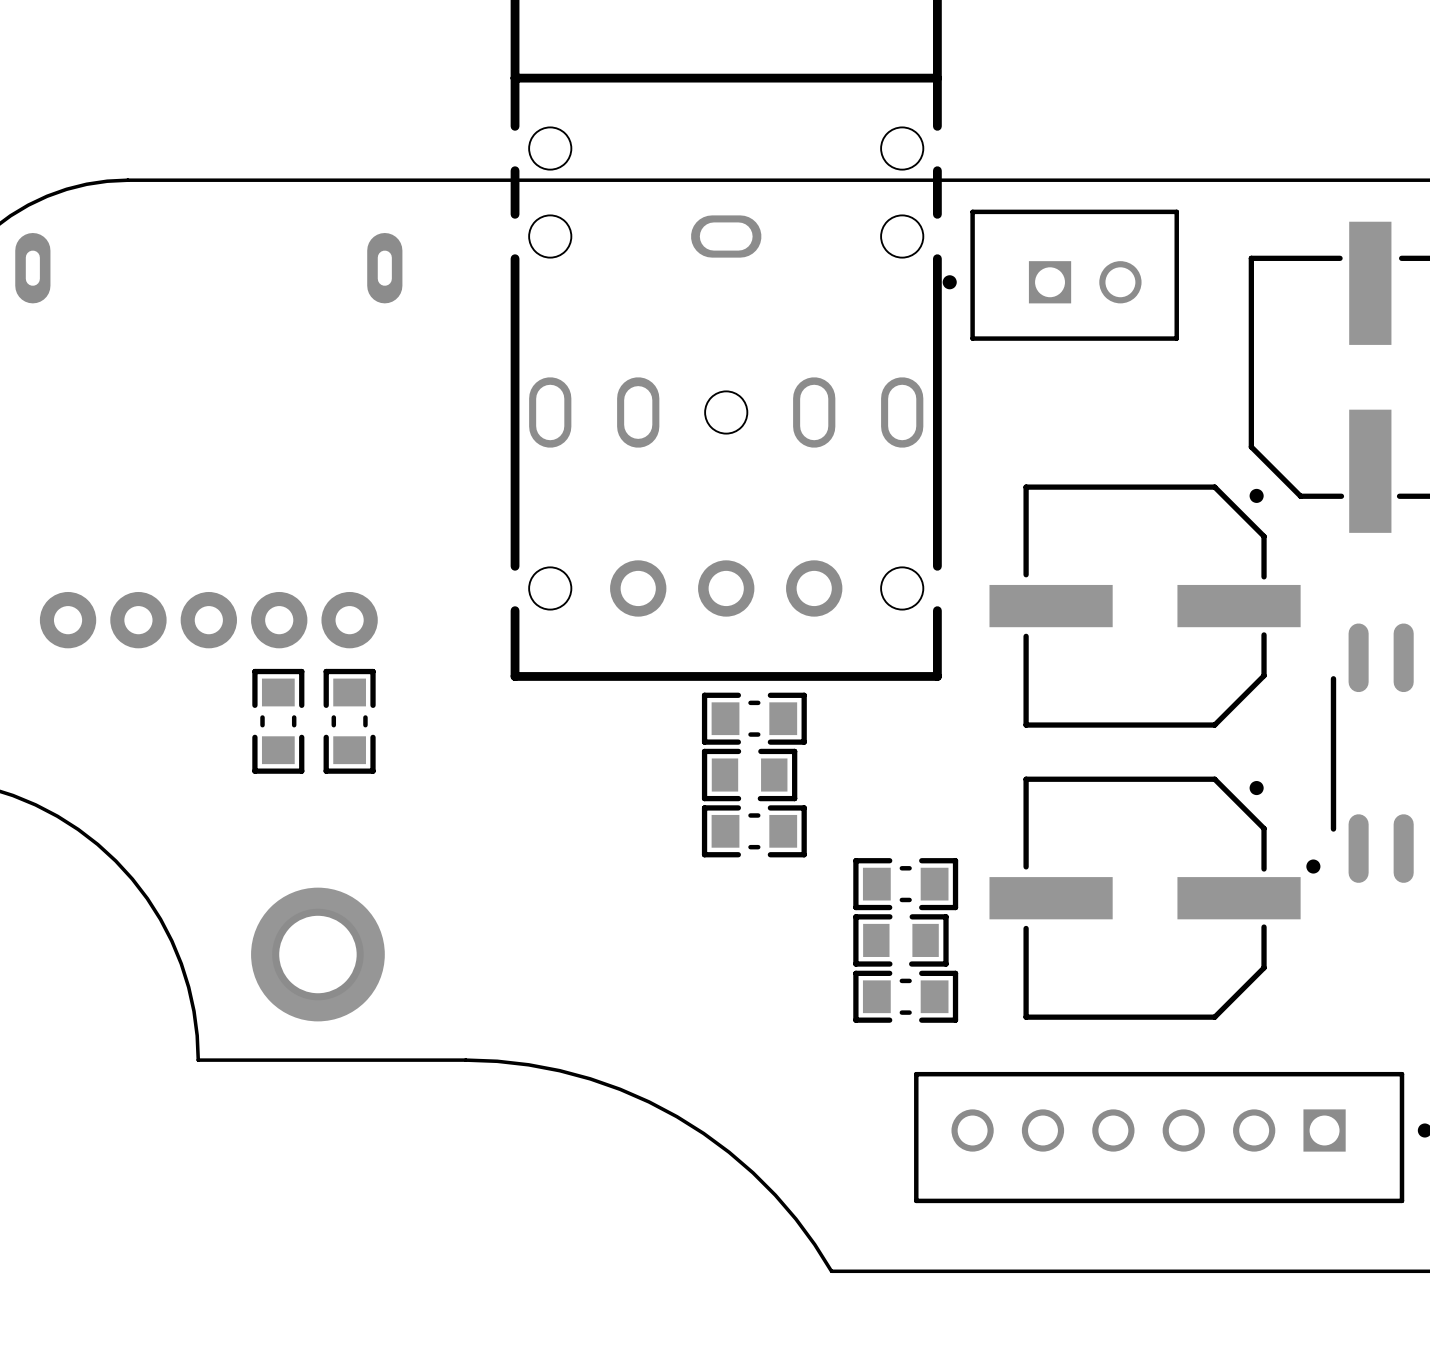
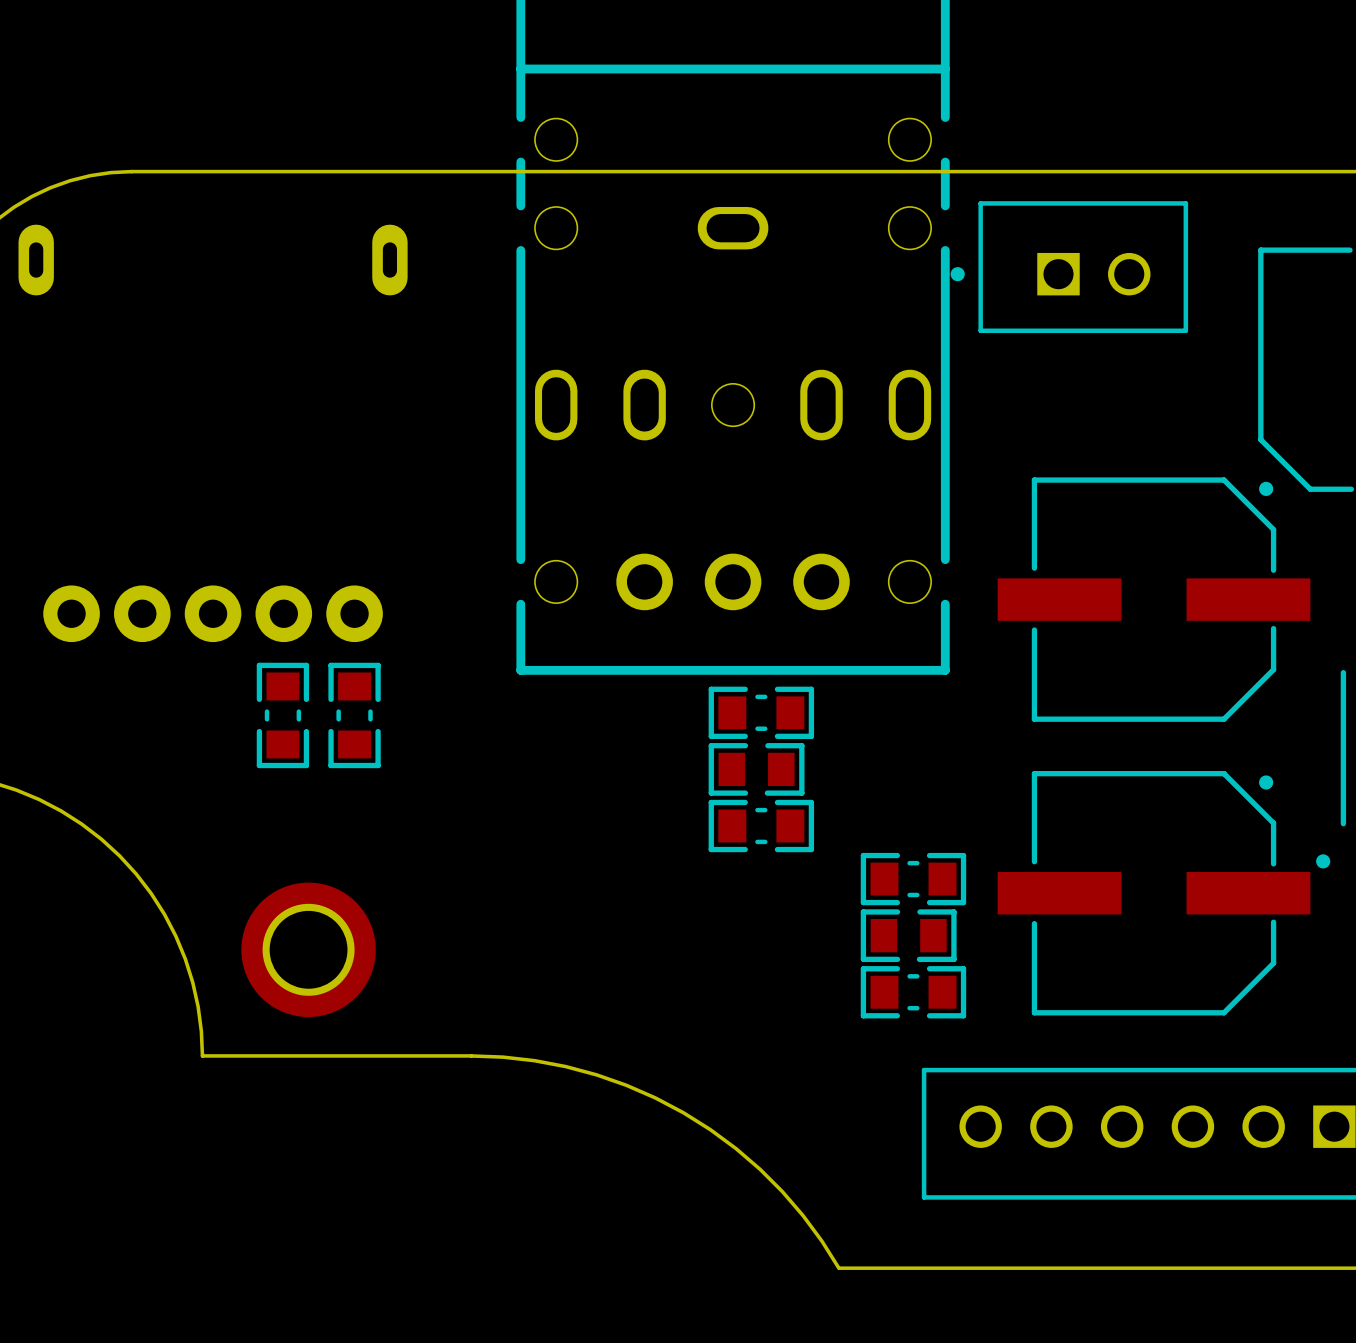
part position: (317, 954) -> (308, 949)

